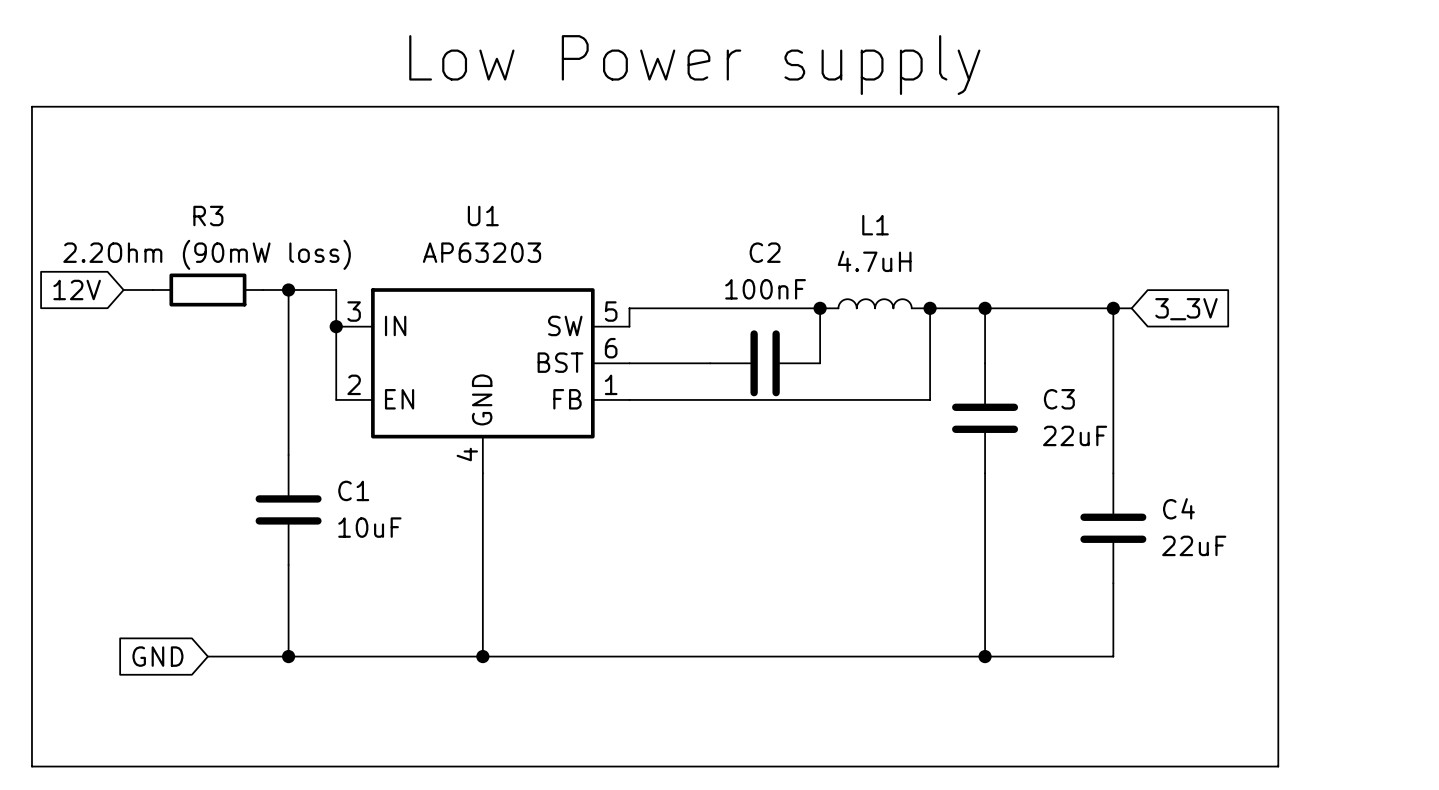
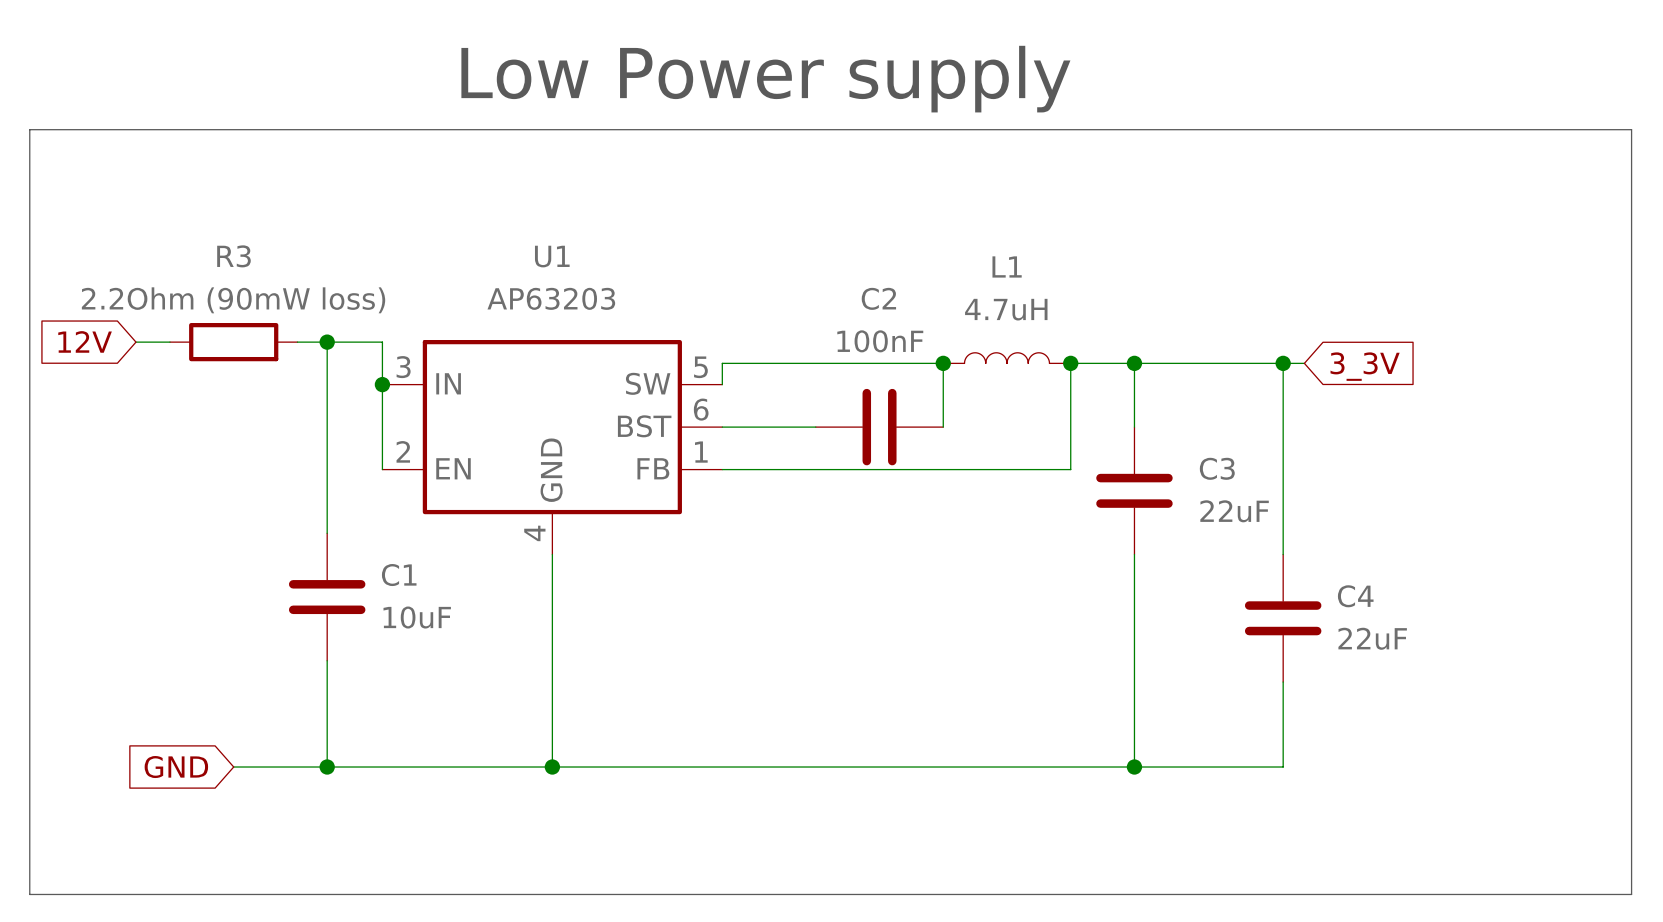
line: (1278, 106) (1278, 766) -> (1474, 129) (1631, 129) (1631, 894) (1474, 894)

